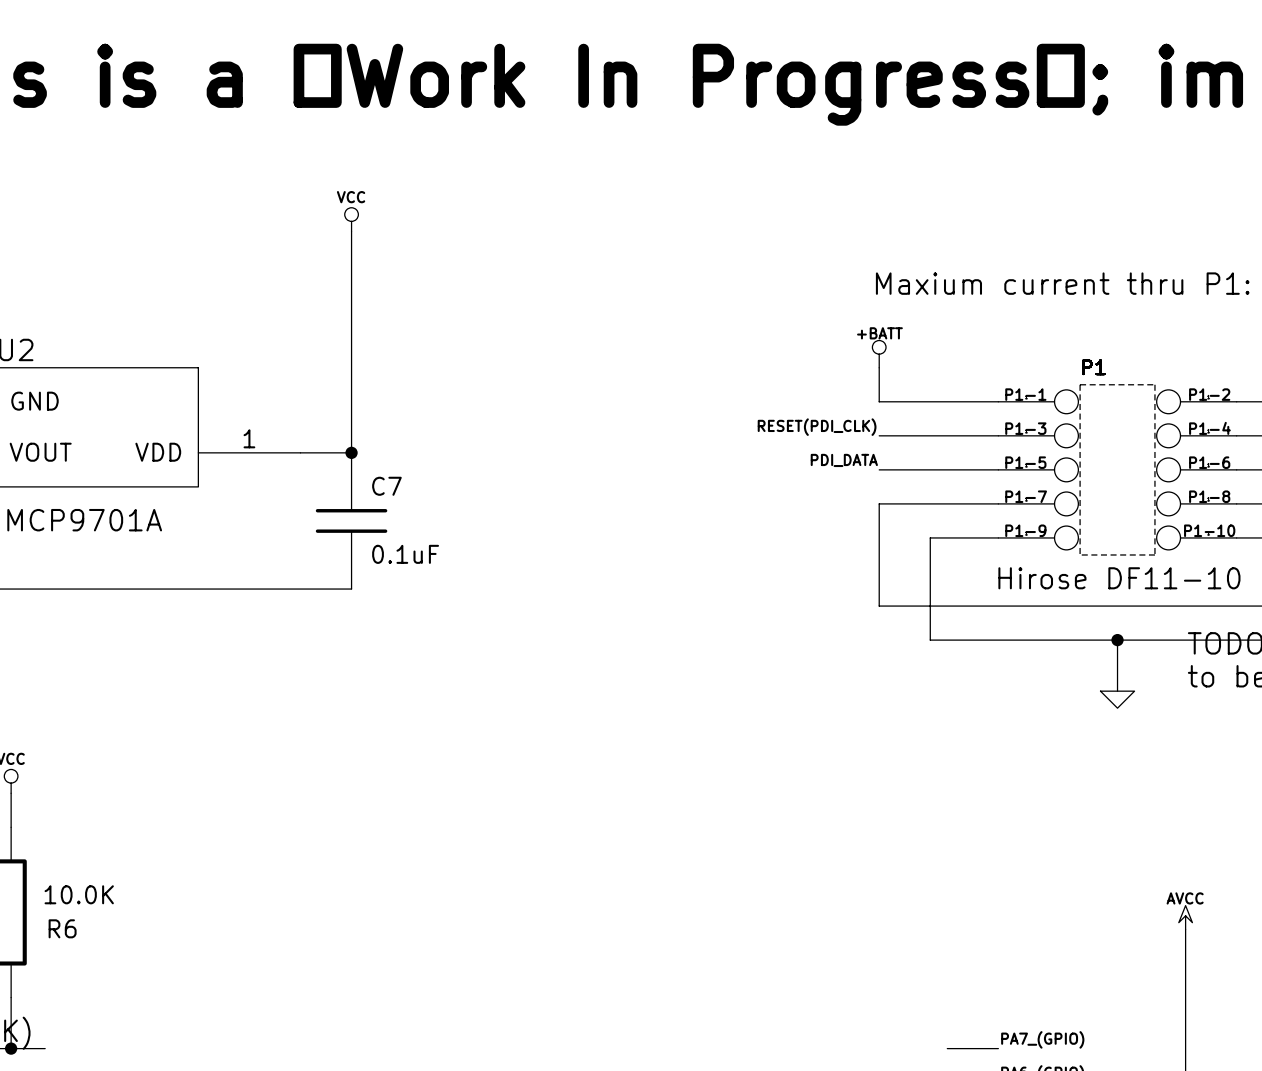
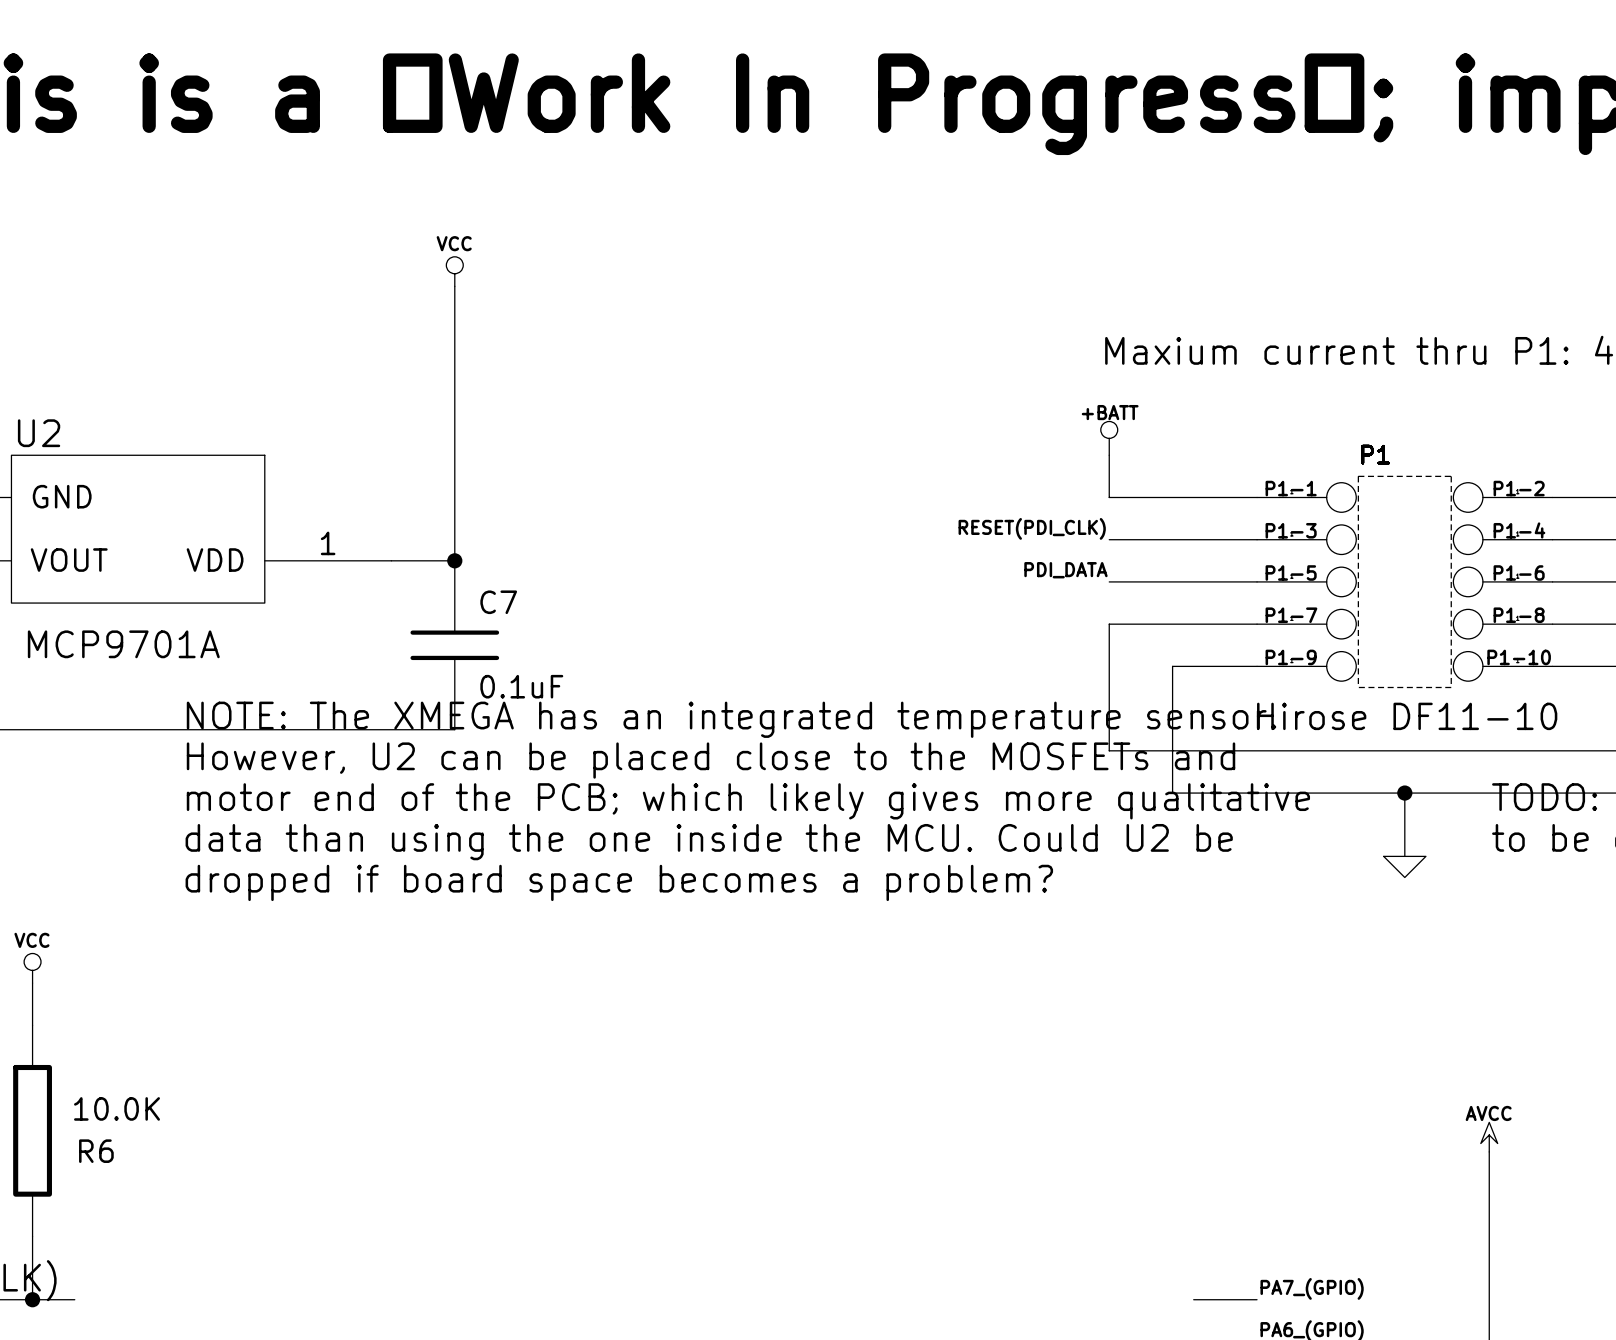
text: none -> NOTE: The XMEGA has an integrated temperature sensor. (731, 719)
text: none -> However, U2 can be placed close to the MOSFETs and (711, 760)
text: none -> motor end of the PCB; which likely gives more qualitative (748, 801)
text: none -> data than using the one inside the MCU. Could U2 be (709, 842)
text: none -> dropped if board space becomes a problem? (619, 882)

